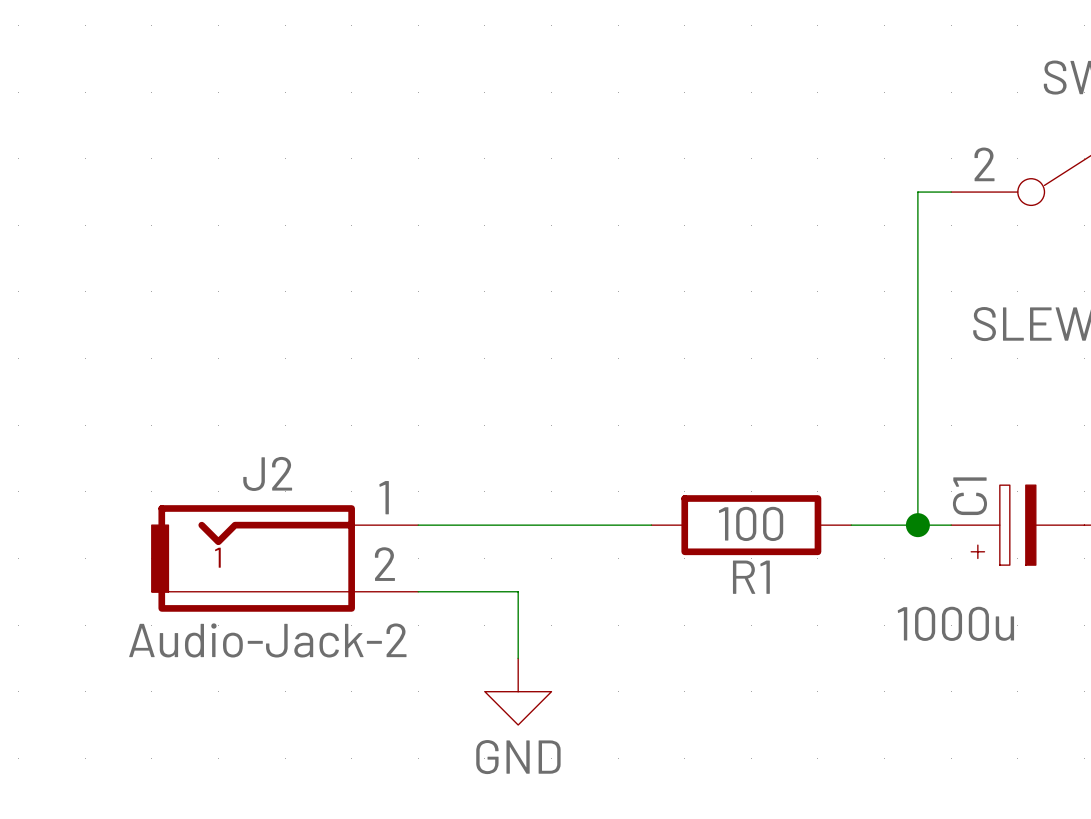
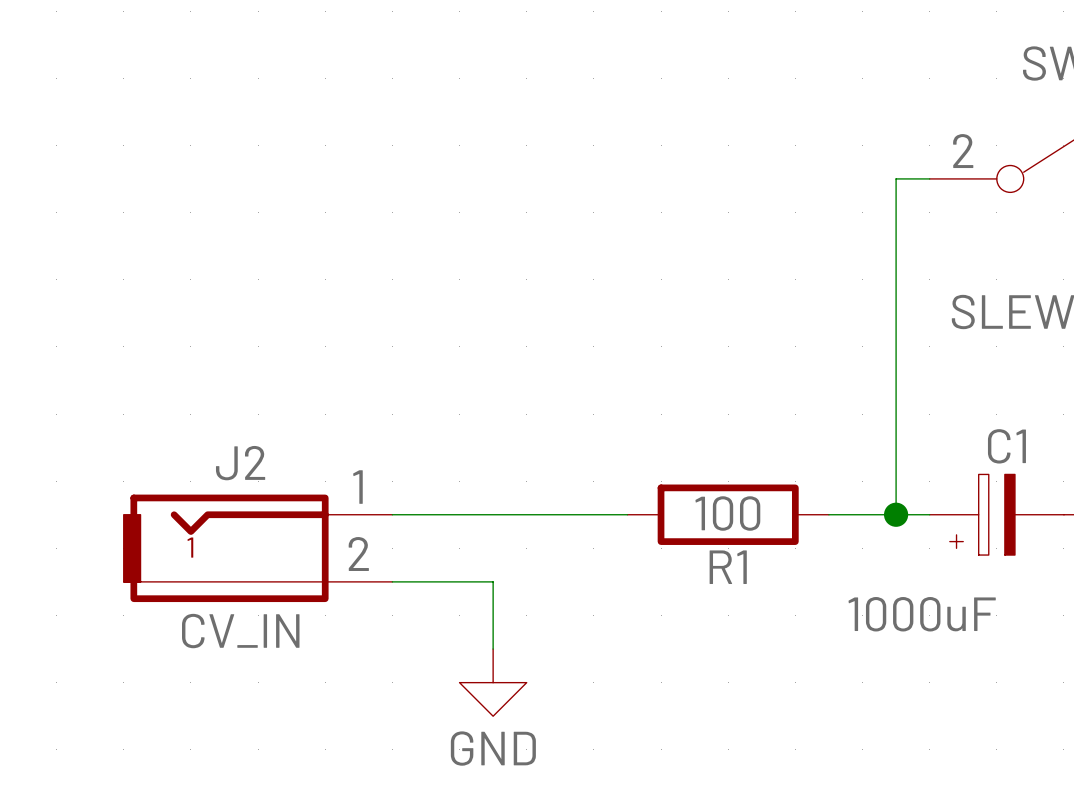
C1 name rotation: 0° (969, 496) -> 90° clockwise (1006, 446)
C1 value: 1000u (955, 623) -> 1000uF (922, 614)
J2 value: Audio-Jack-2 (267, 640) -> CV_IN (240, 631)

